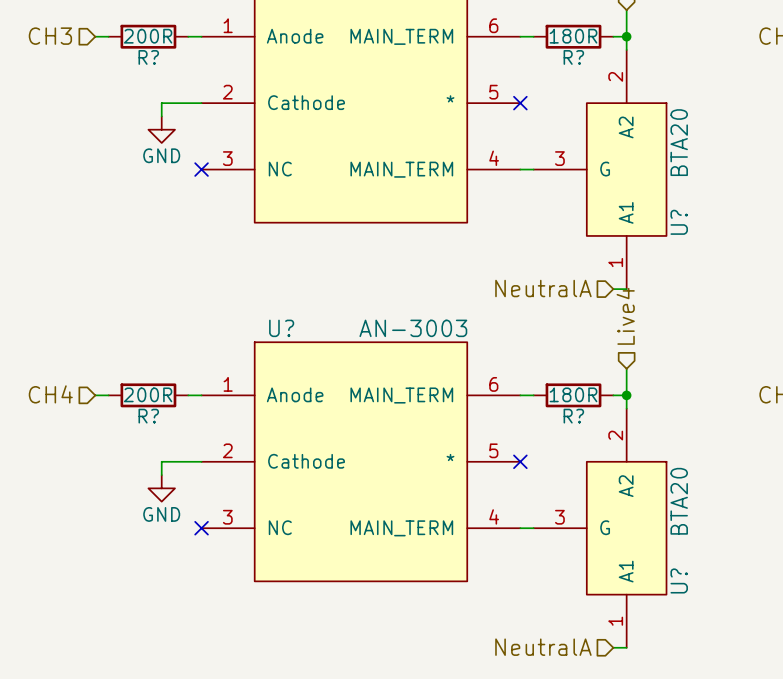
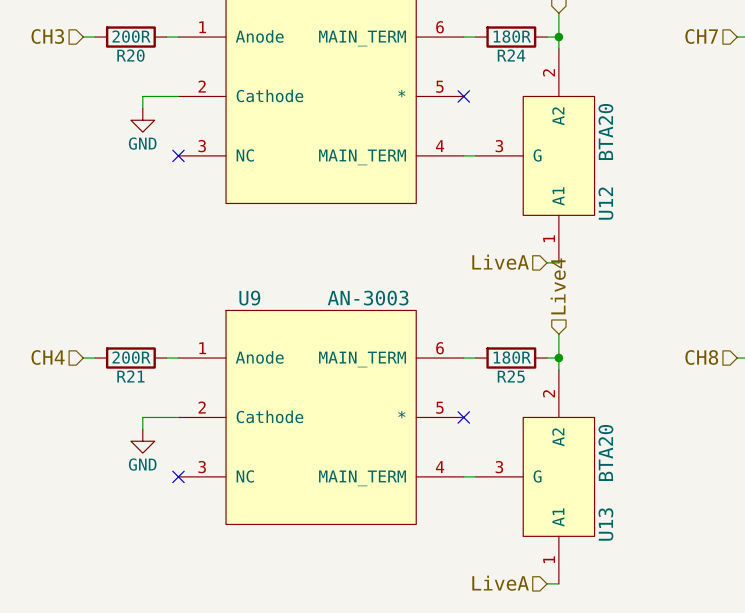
R? name: R? (148, 57) -> R20 (130, 55)
R? name: R? (573, 57) -> R24 (511, 55)
U? name: U? (679, 222) -> U12 (605, 203)
hierarchical label: NeutralA (543, 288) -> LiveA (500, 262)
U? name: U? (281, 328) -> U9 (249, 298)
R? name: R? (148, 416) -> R21 (130, 376)
R? name: R? (573, 416) -> R25 (511, 376)
U? name: U? (679, 580) -> U13 (605, 524)
hierarchical label: NeutralA (543, 647) -> LiveA (500, 583)

